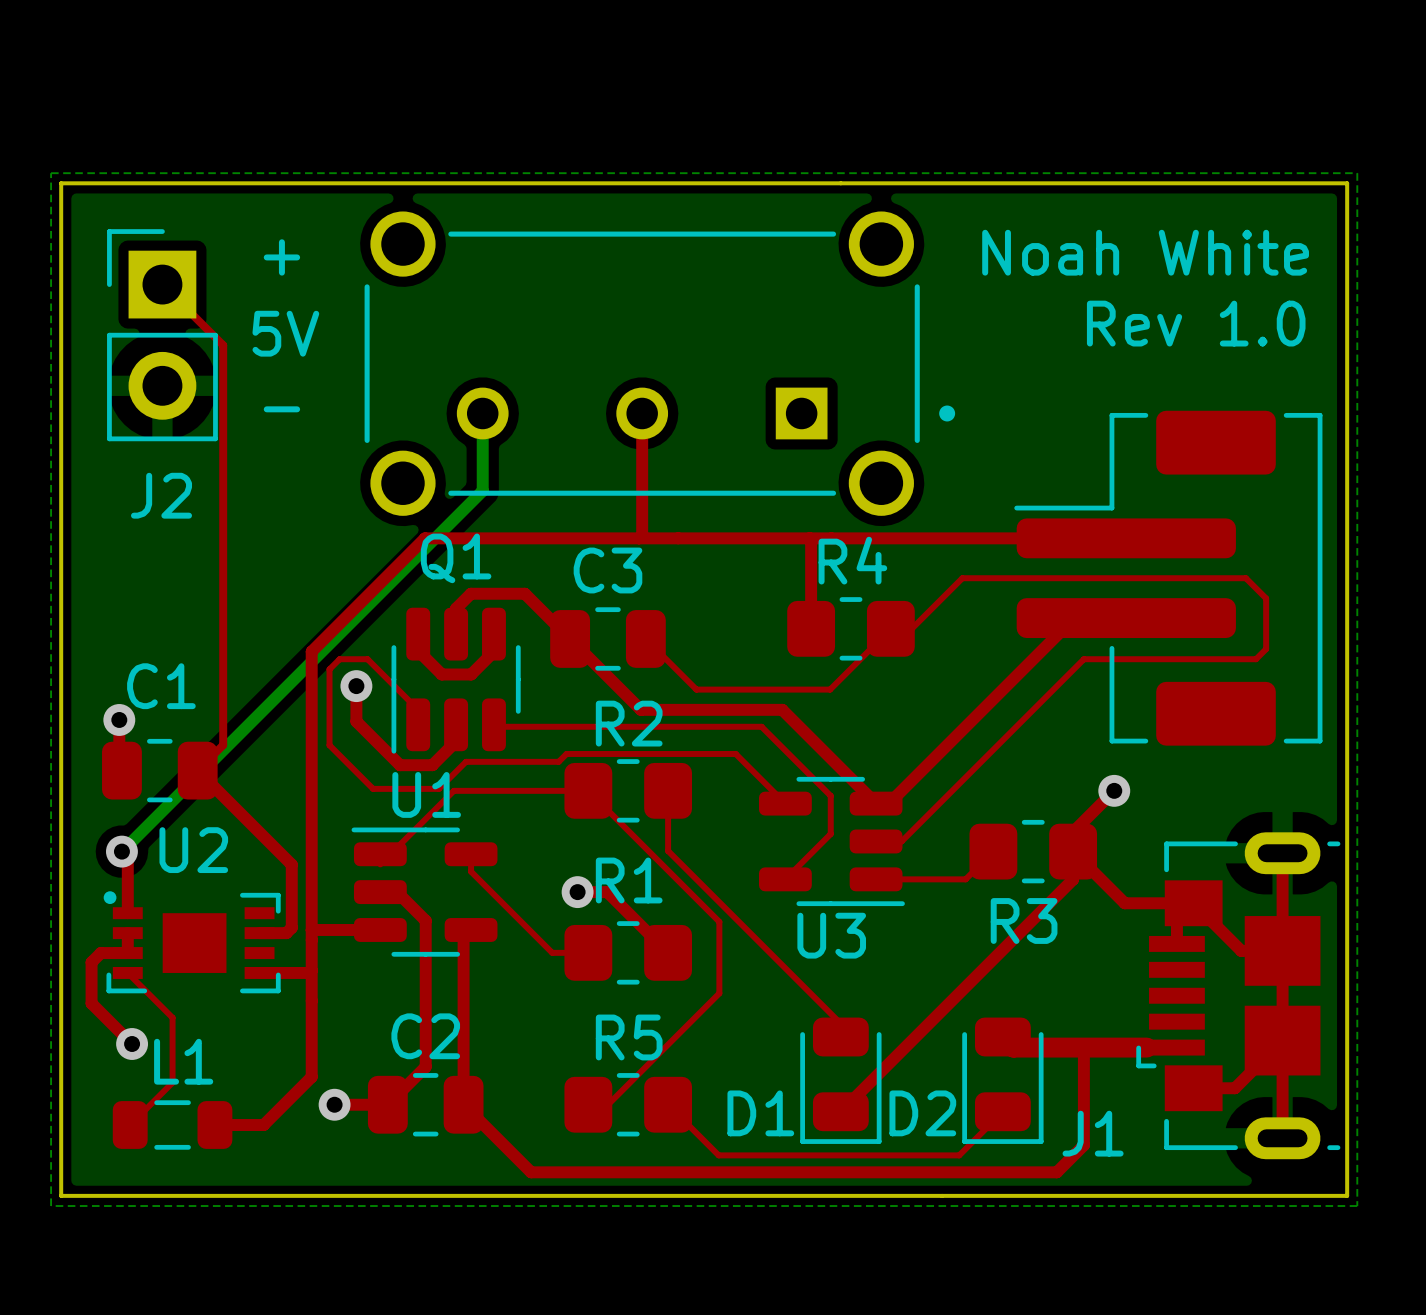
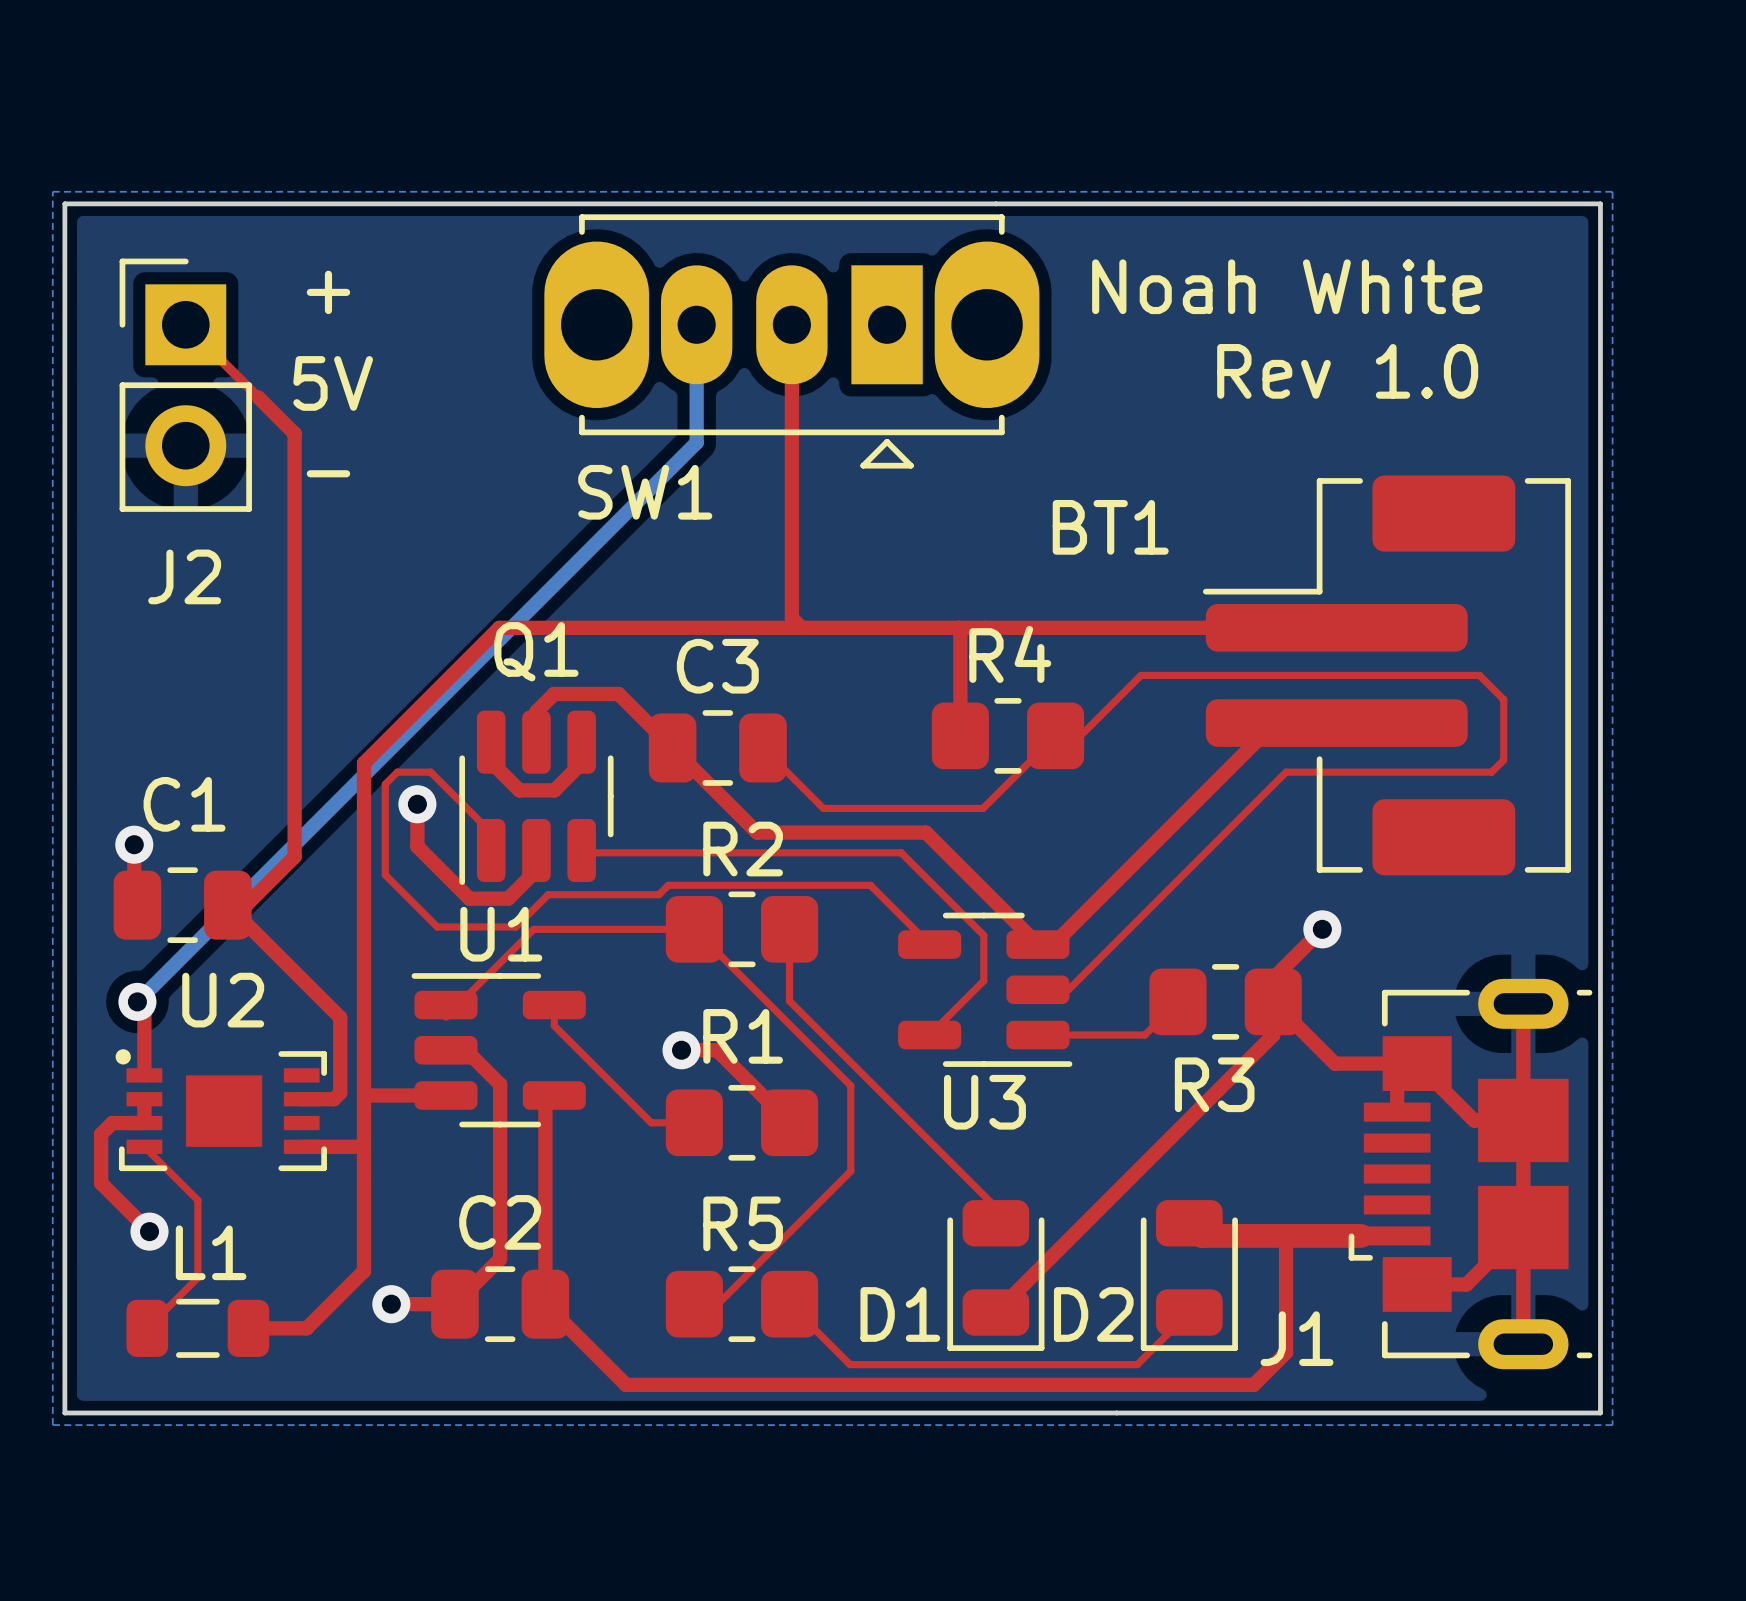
text position: Noah White (1145, 252) -> Noah White (1287, 286)
top track: none -> (791, 324) (791, 618) (801, 627)
SW1: none -> (791, 341)
text position: Rev 1.0 (1196, 323) -> Rev 1.0 (1347, 371)
top track: (223, 345) (223, 745) (197, 770) -> (258, 397) (294, 433) (294, 856) (246, 905) (227, 905)
part: (659, 363) -> none
bottom track: (482, 413) (482, 490) -> (696, 324) (696, 442) (568, 571)
top track: (642, 413) (642, 535) (638, 538) -> none
BT1 name: none -> BT1 (1110, 527)

